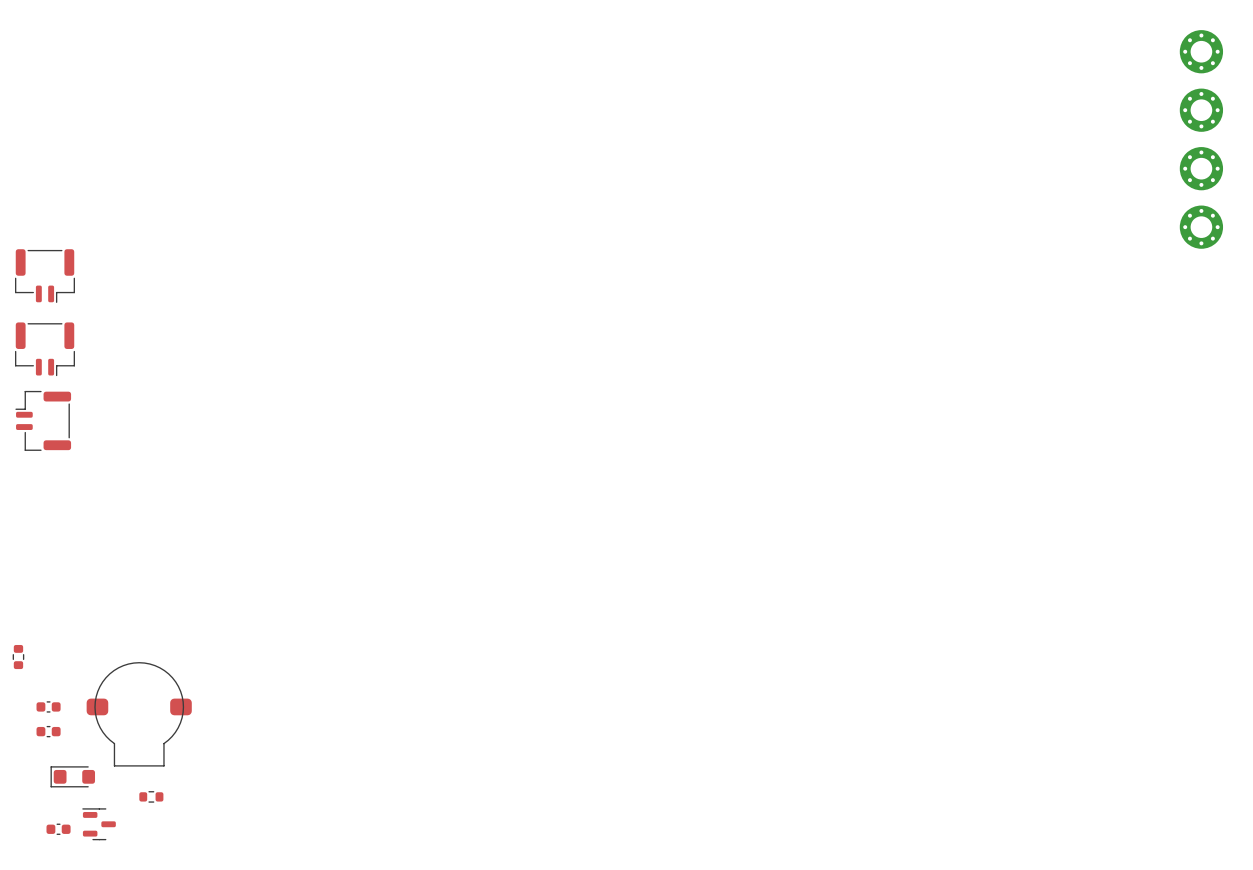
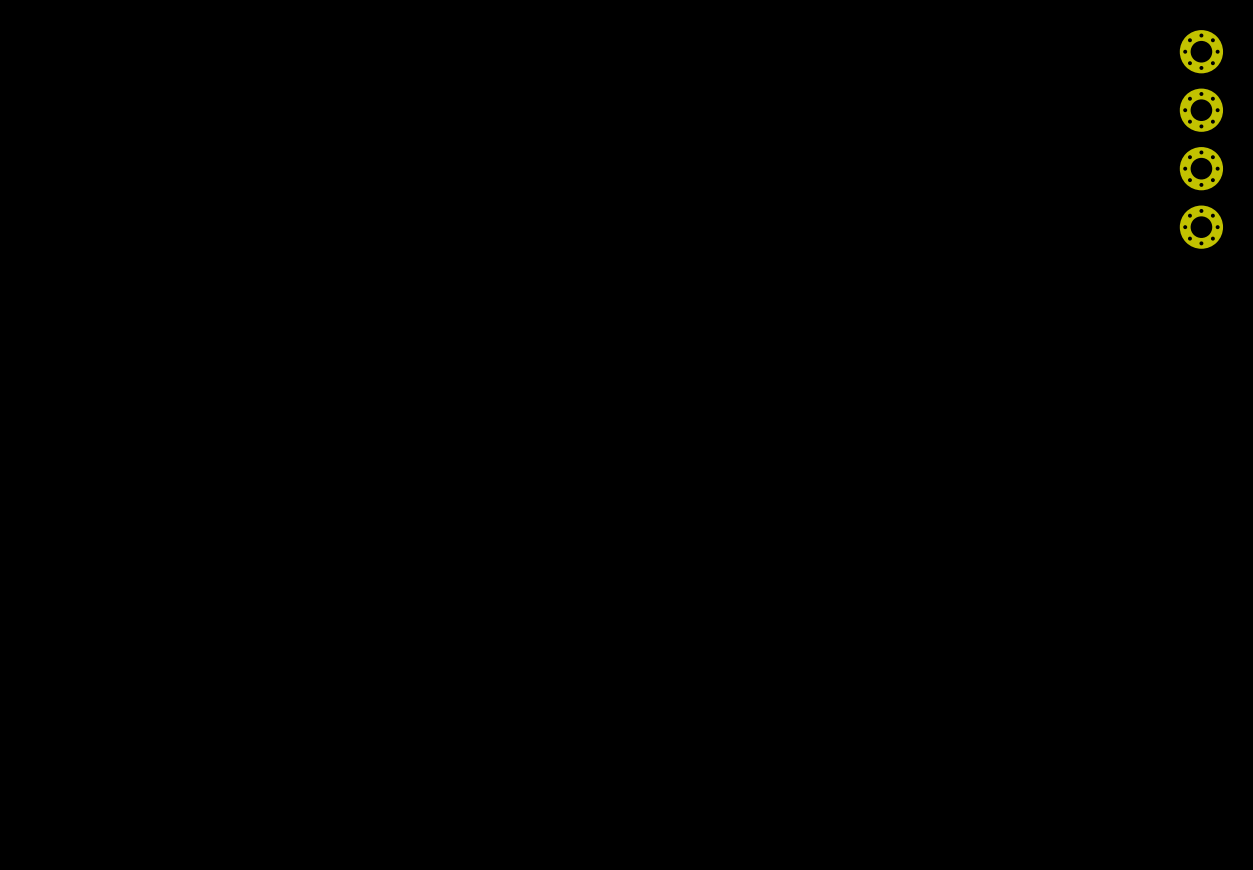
part: (44, 276) -> none
part: (44, 349) -> none
part: (43, 420) -> none
part: (18, 657) -> none
part: (48, 706) -> none
part: (139, 714) -> none
part: (48, 731) -> none
part: (72, 776) -> none
part: (151, 796) -> none
part: (99, 824) -> none
part: (58, 829) -> none

